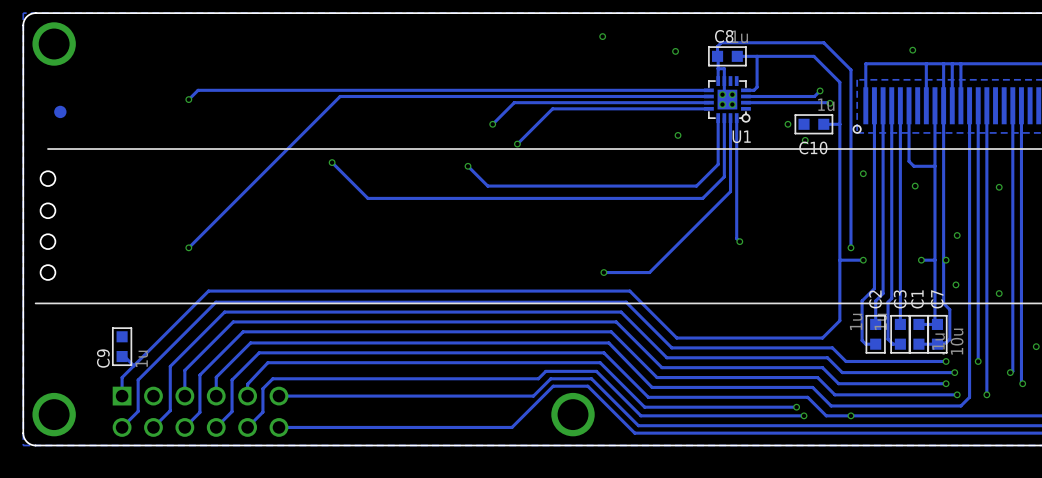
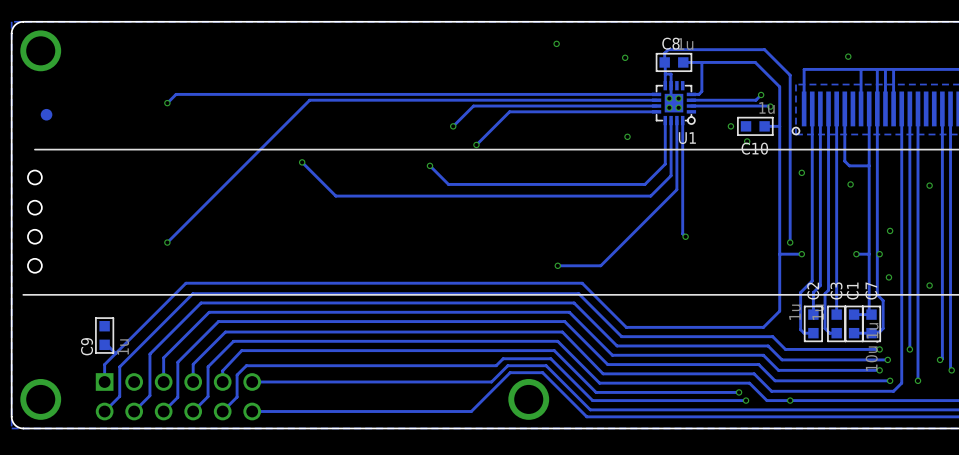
C7 value position: 10u (957, 341) -> 10u (871, 358)

